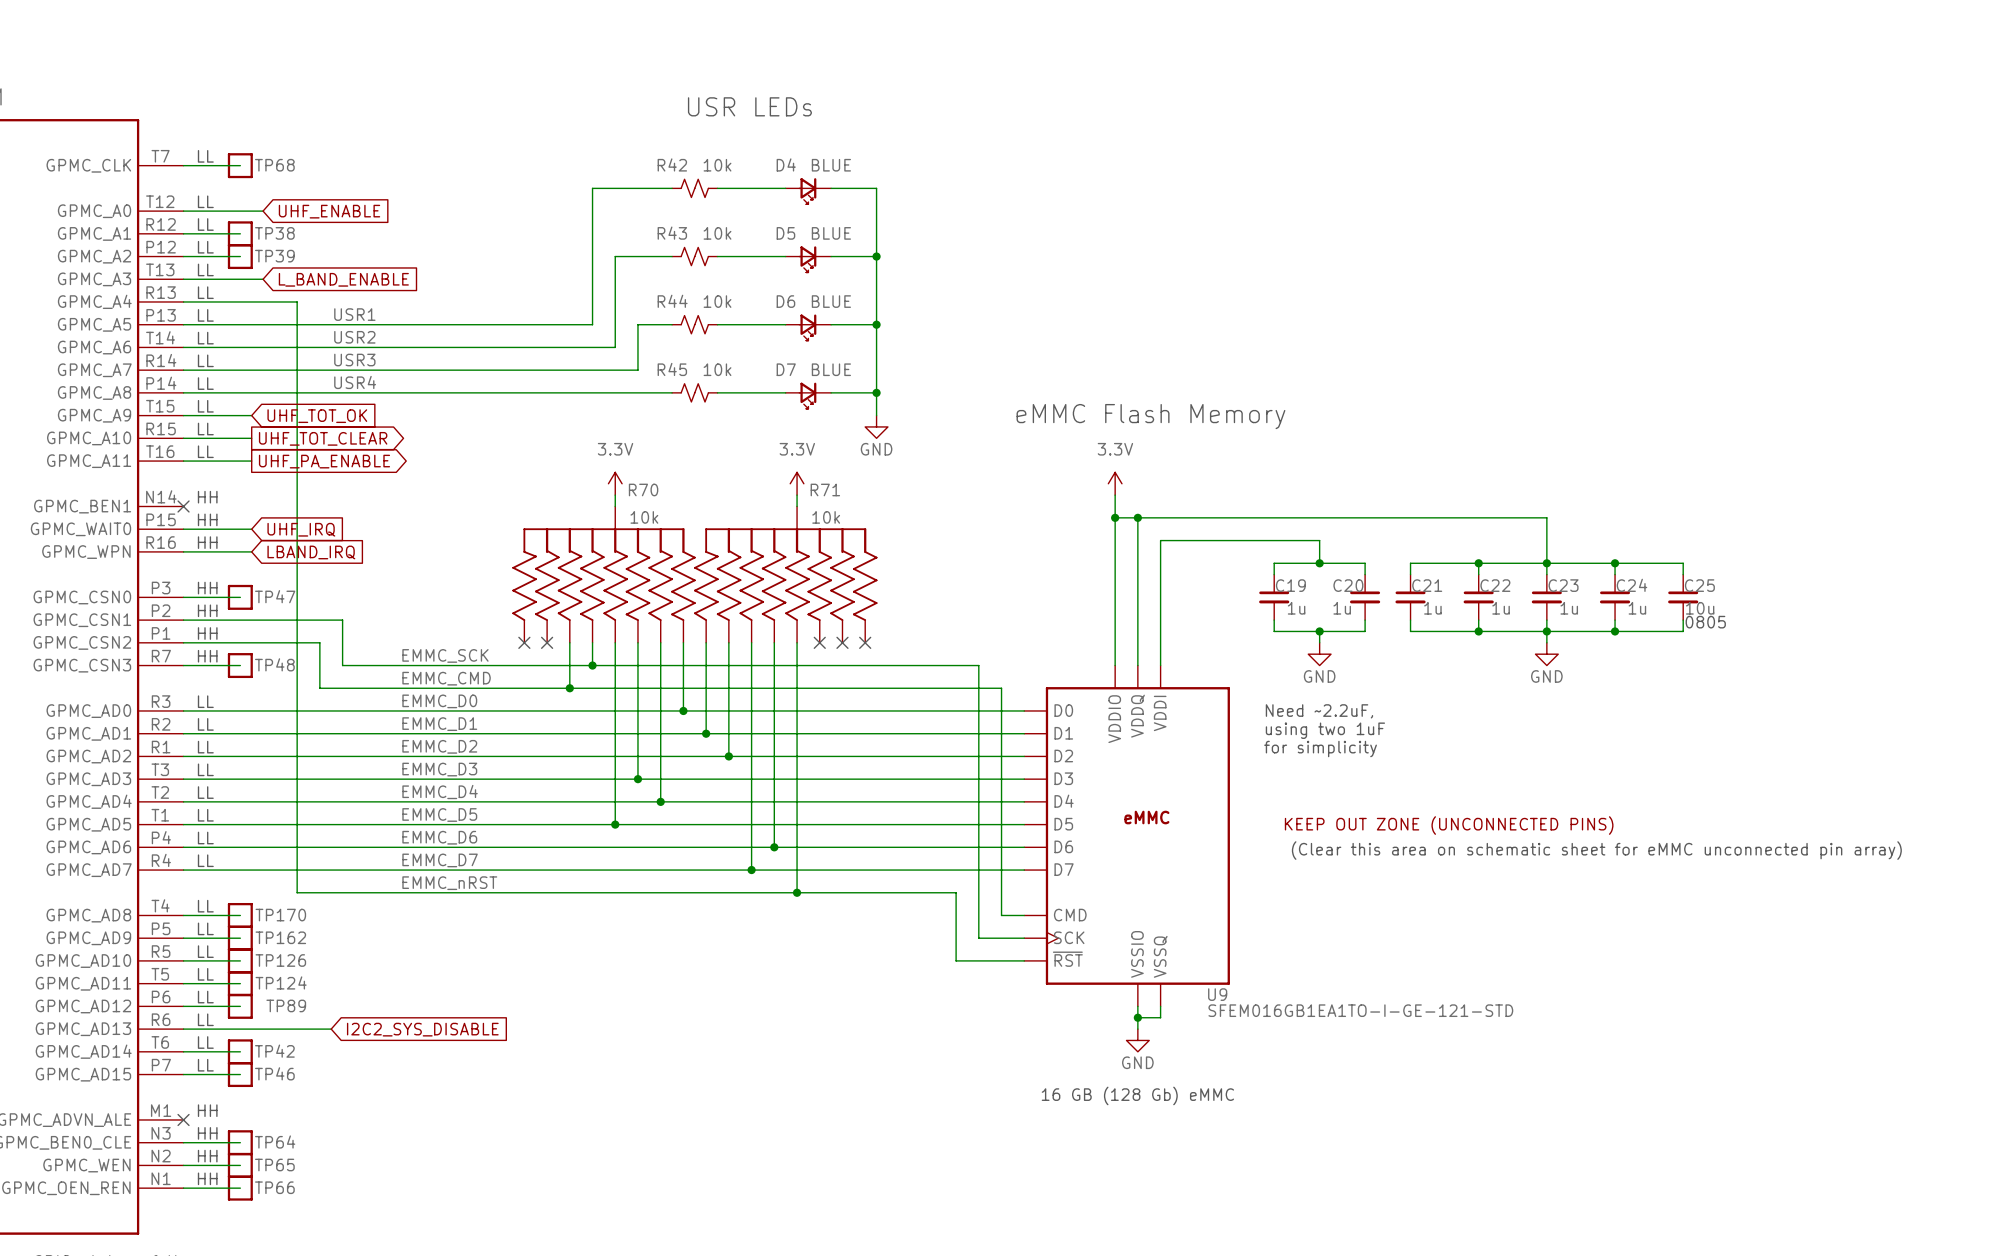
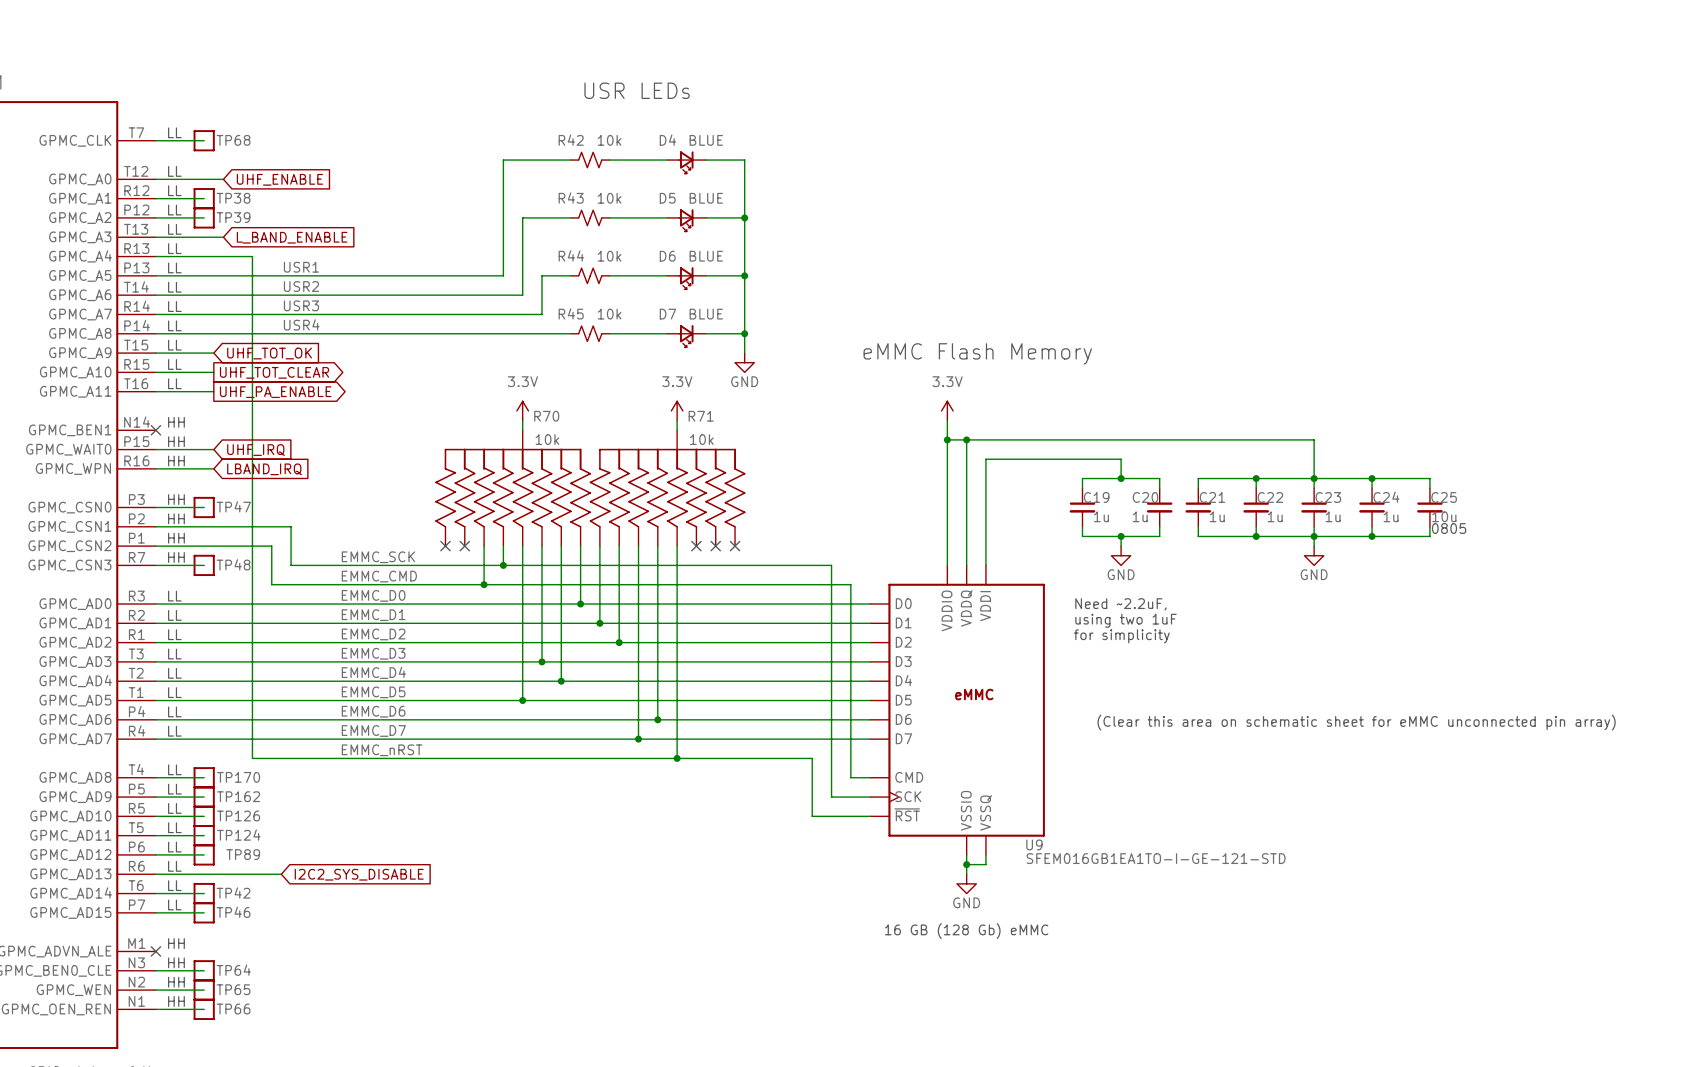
U9 text: KEEP OUT ZONE (UNCONNECTED PINS) (1449, 825) -> none

